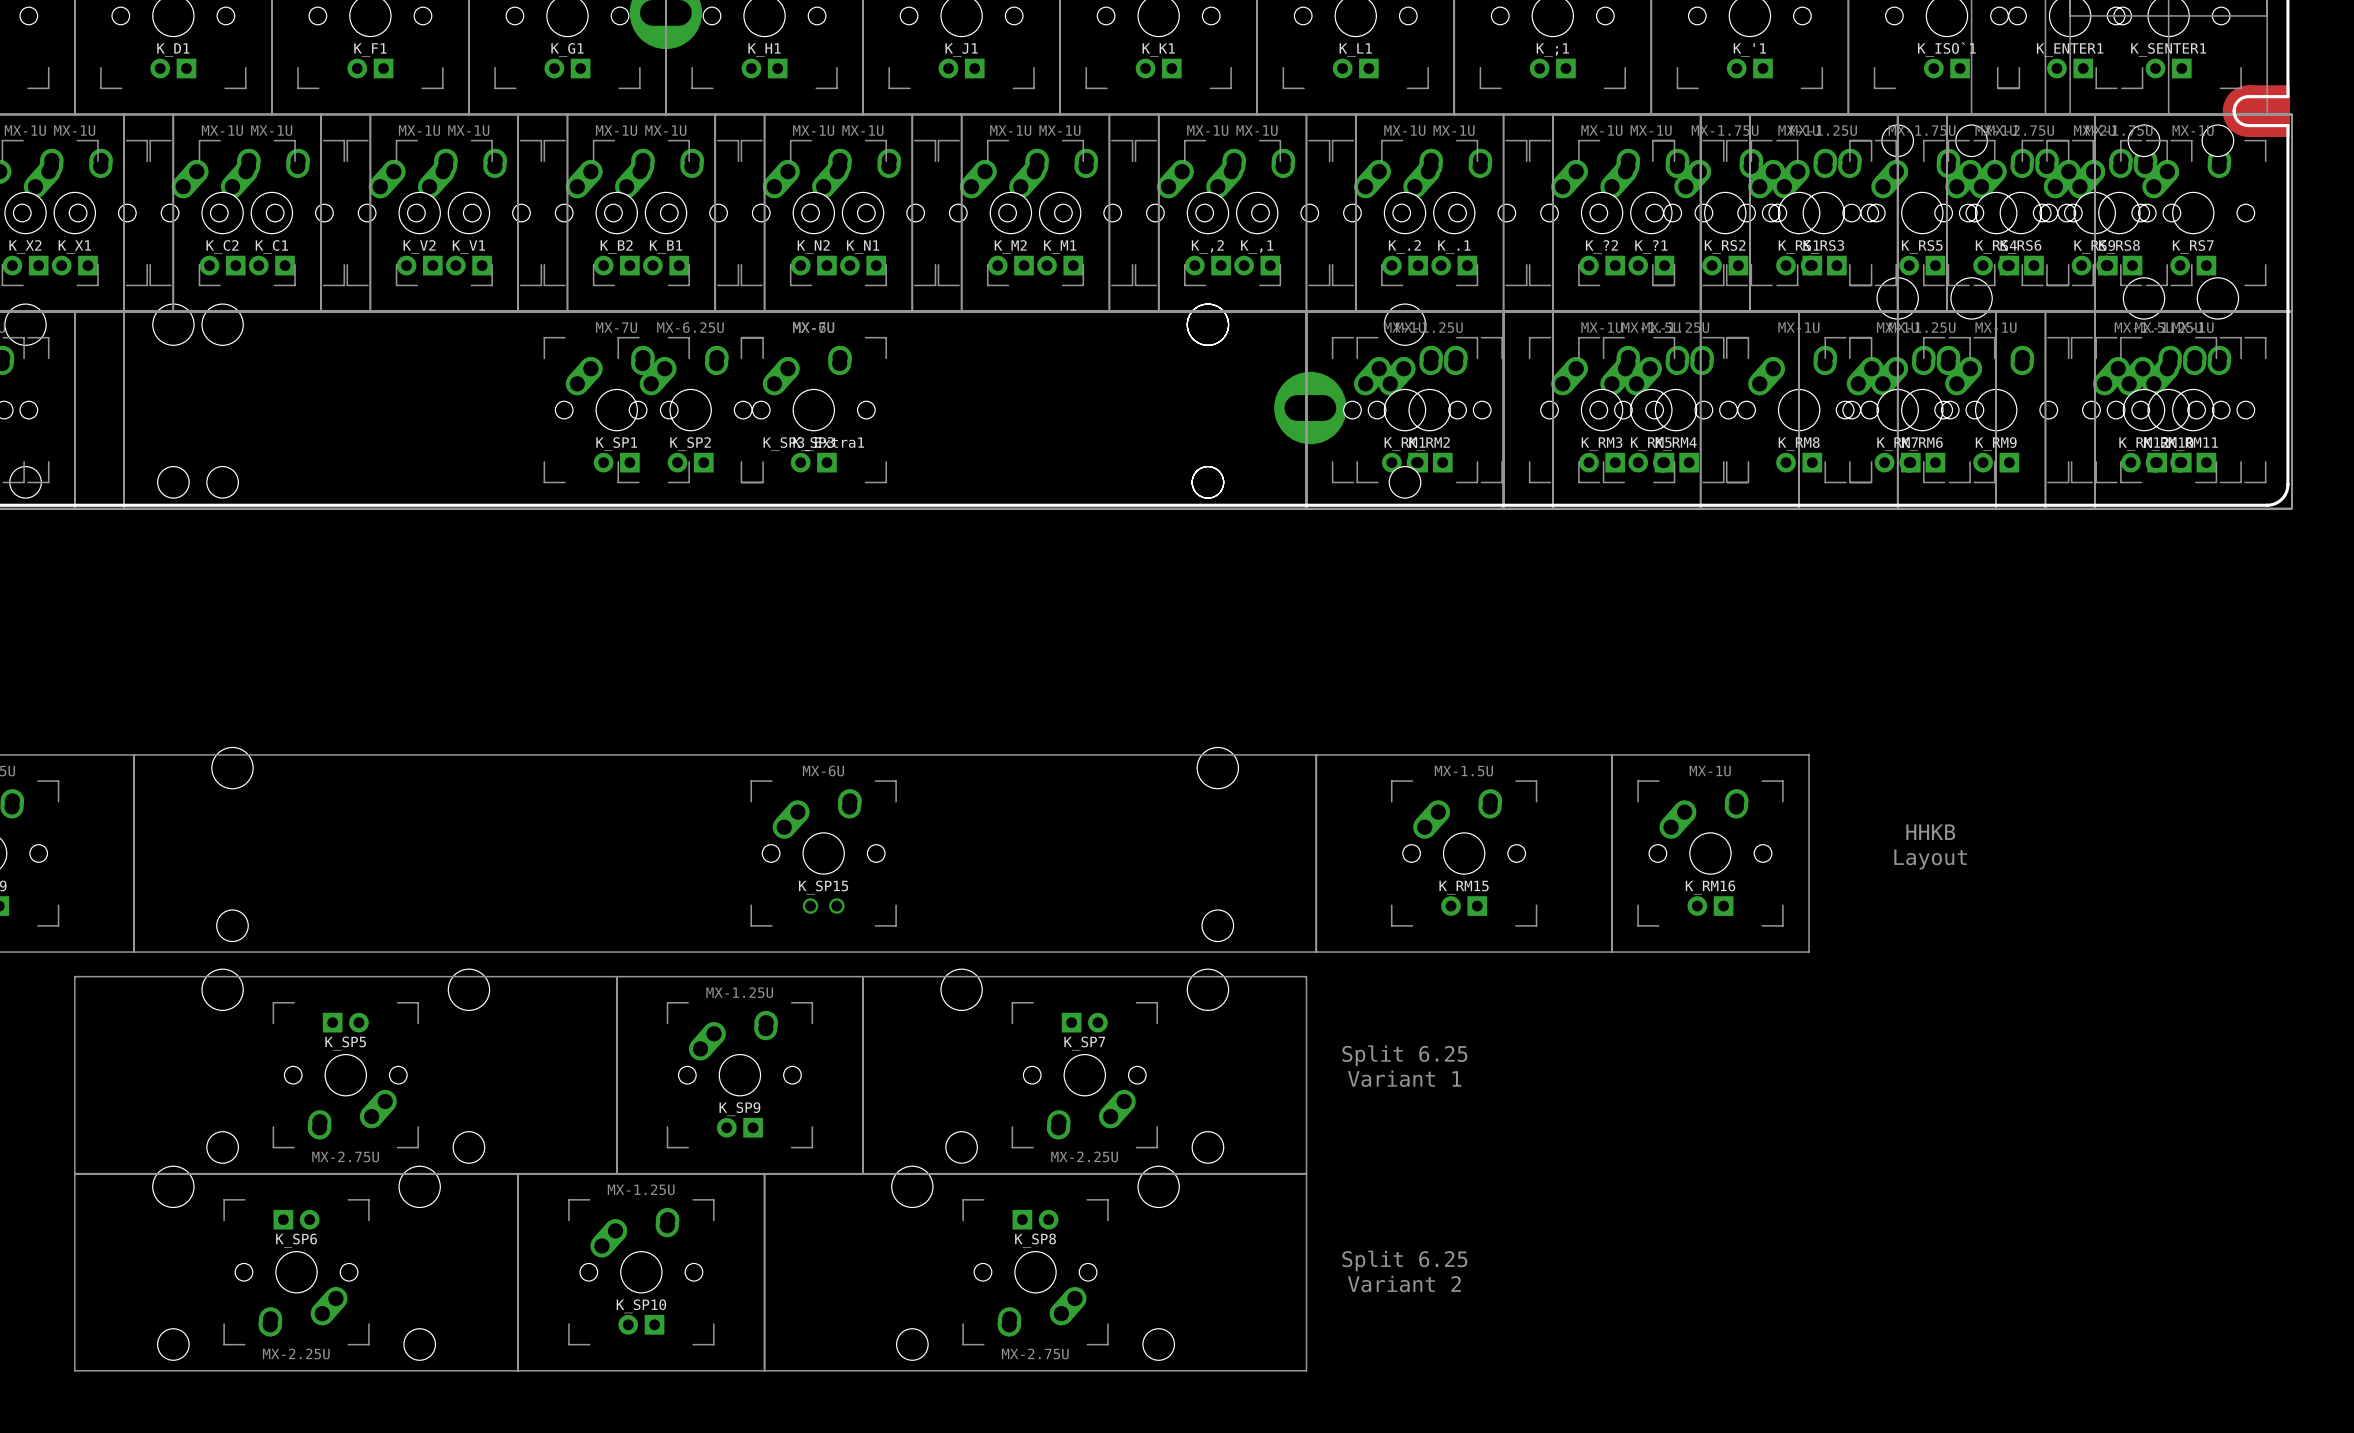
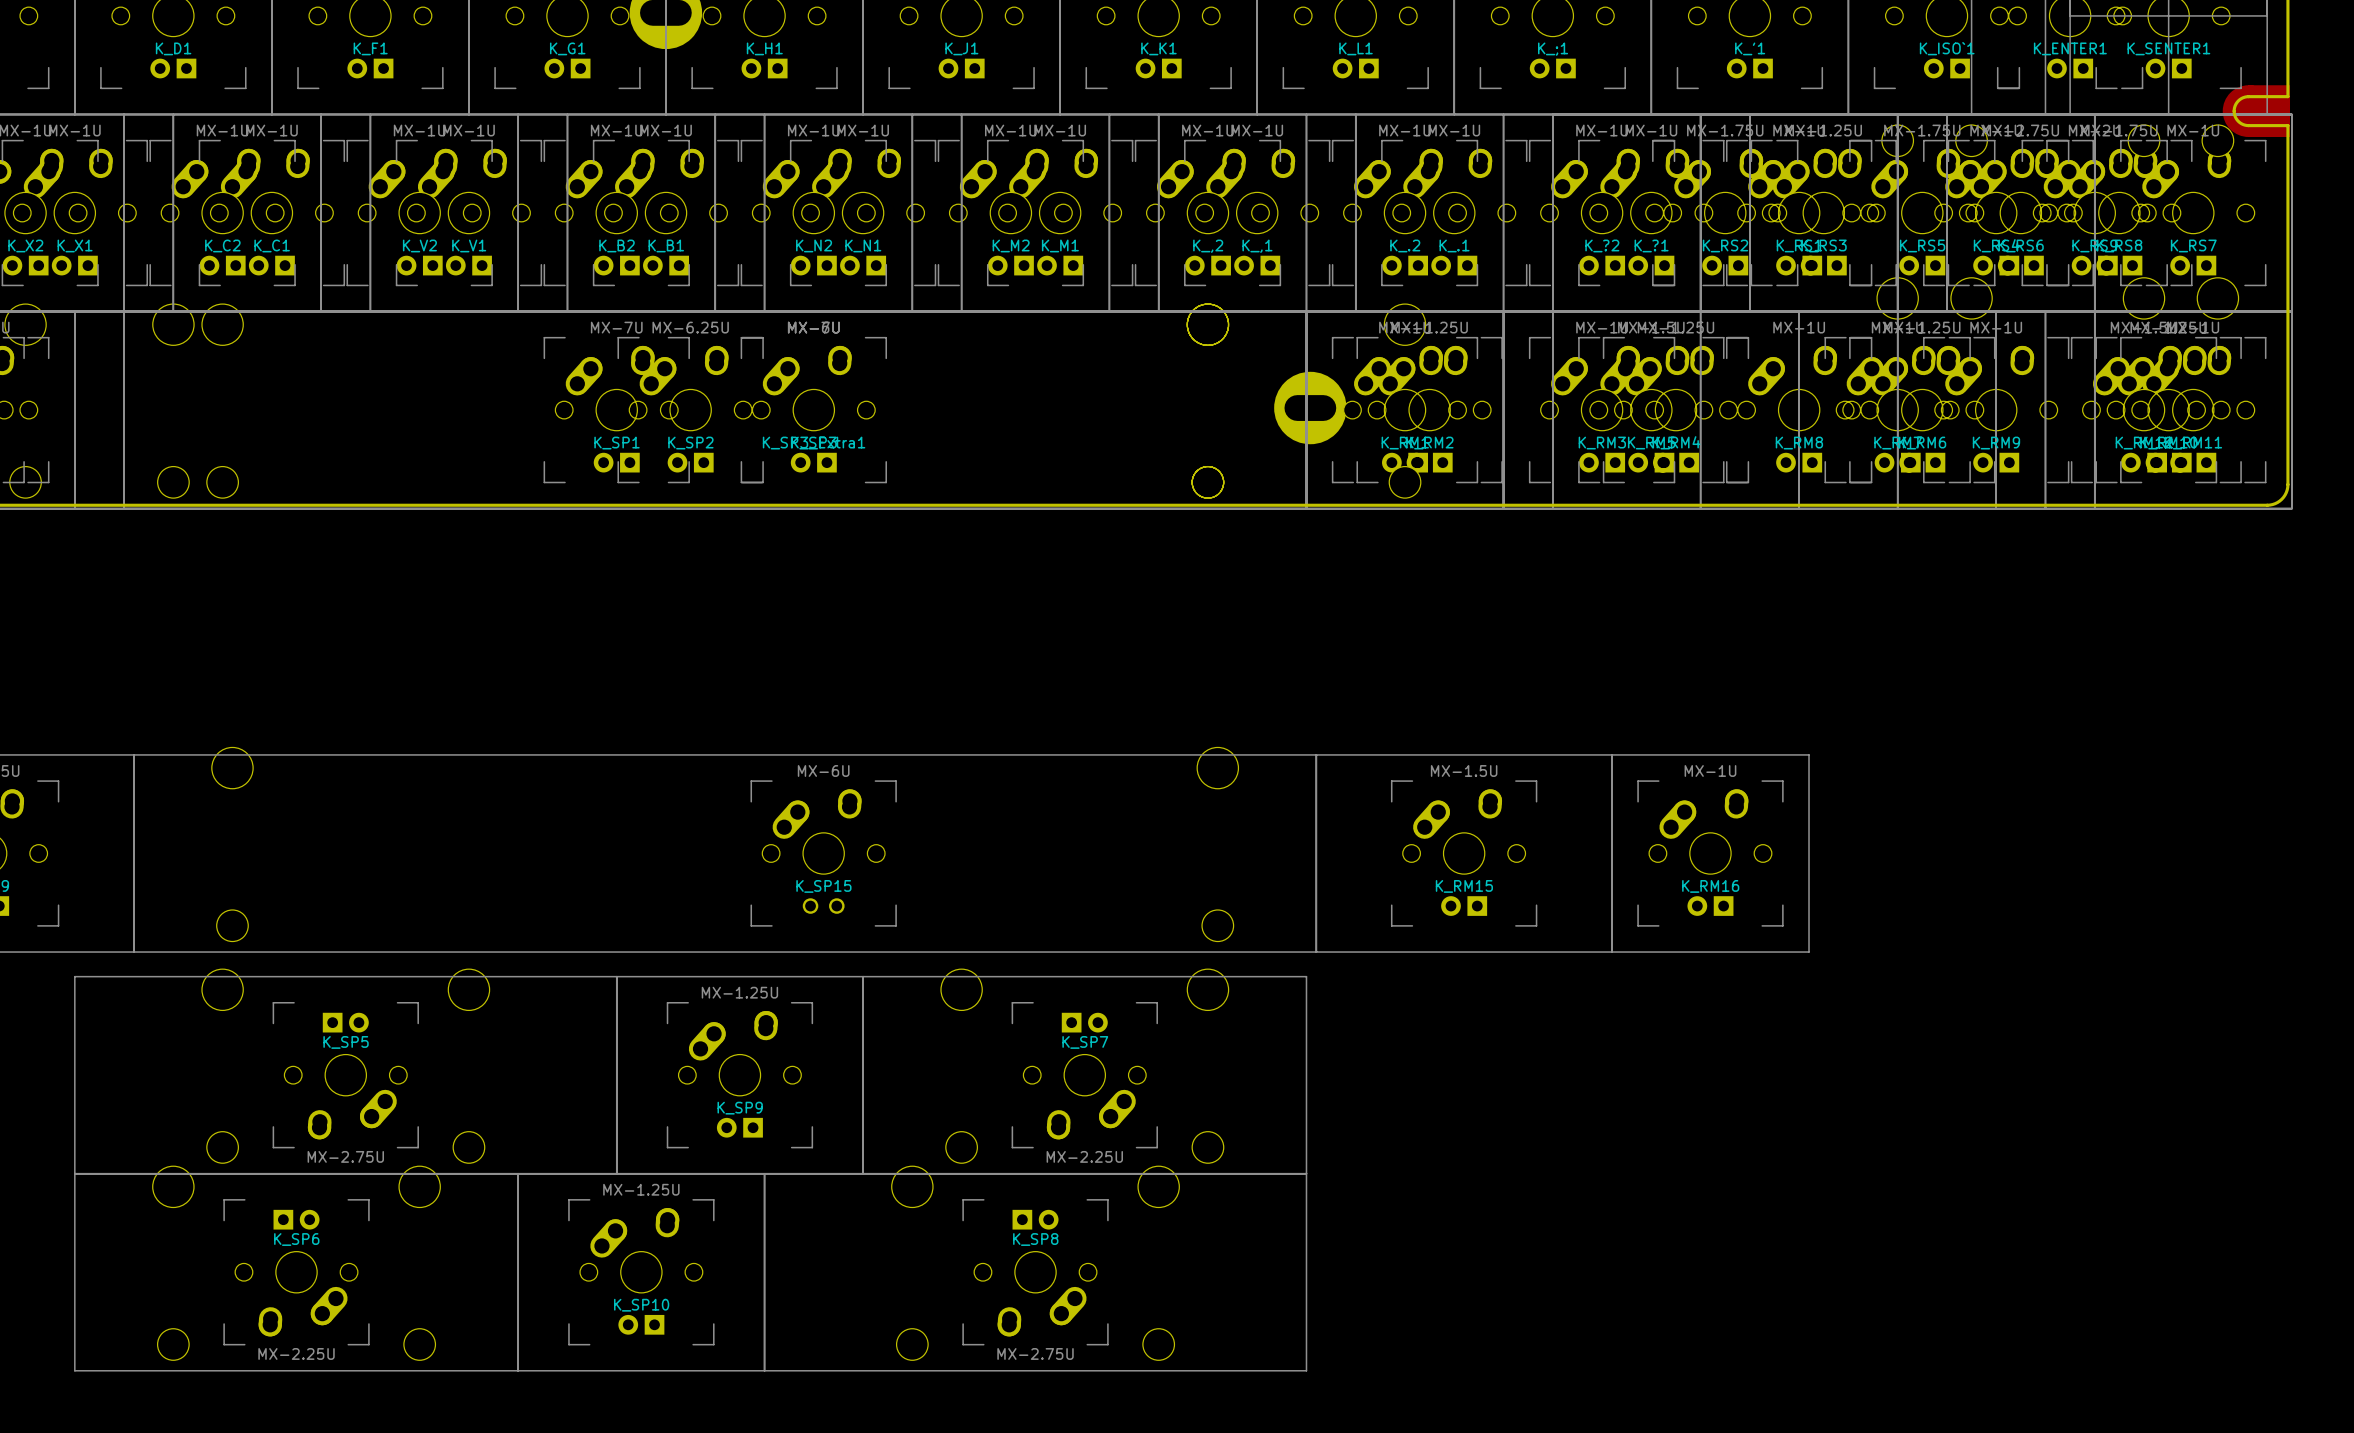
text: HHKB (1930, 832) -> none
text: Layout (1930, 859) -> none
text: Split 6.25 (1404, 1055) -> none
text: Variant 1 (1404, 1078) -> none
text: Split 6.25 (1404, 1261) -> none
text: Variant 2 (1404, 1283) -> none

